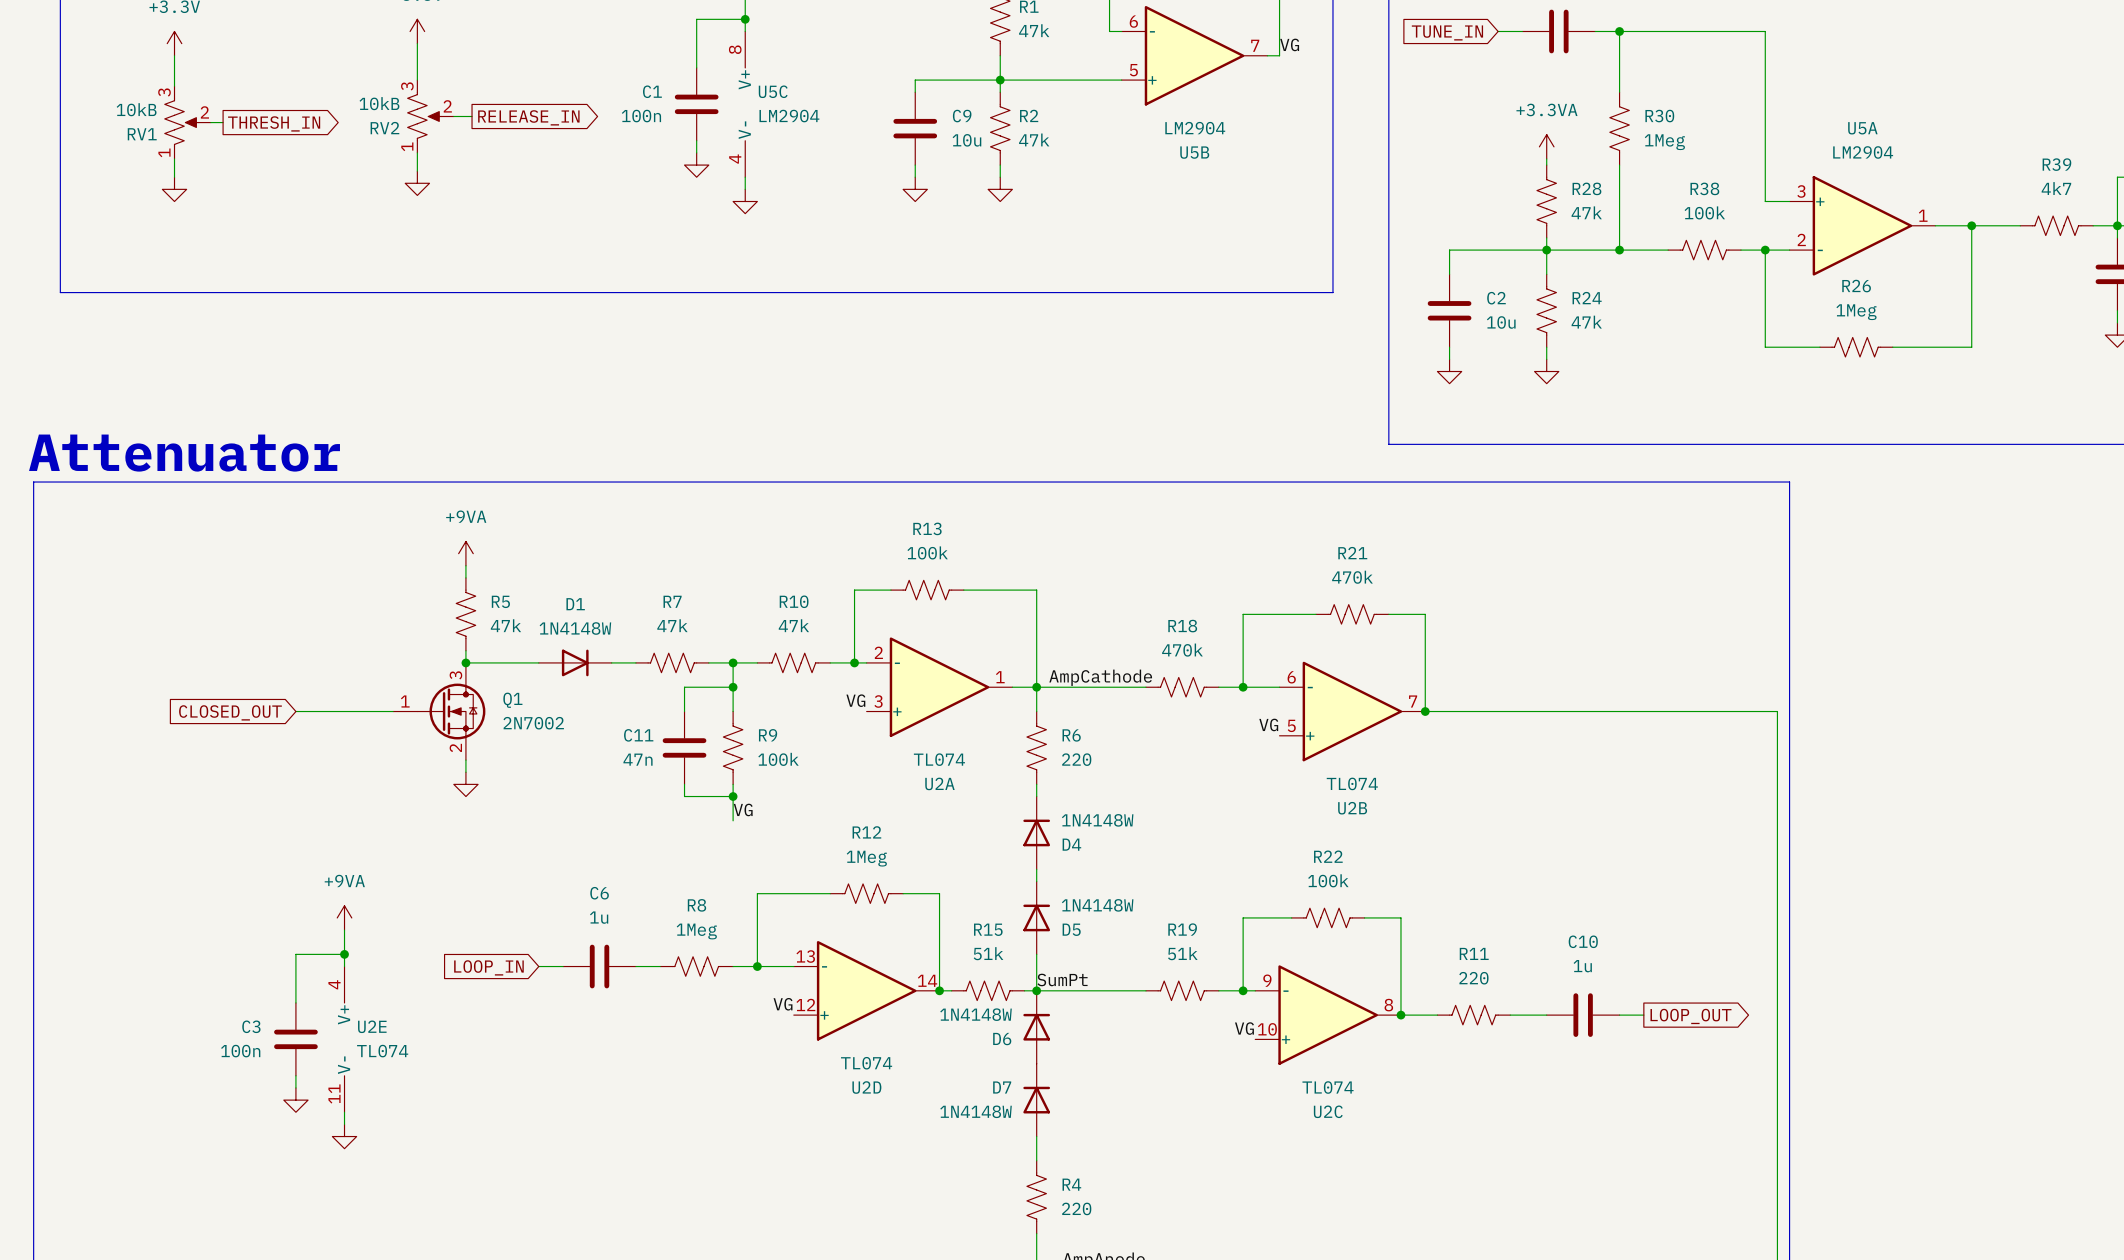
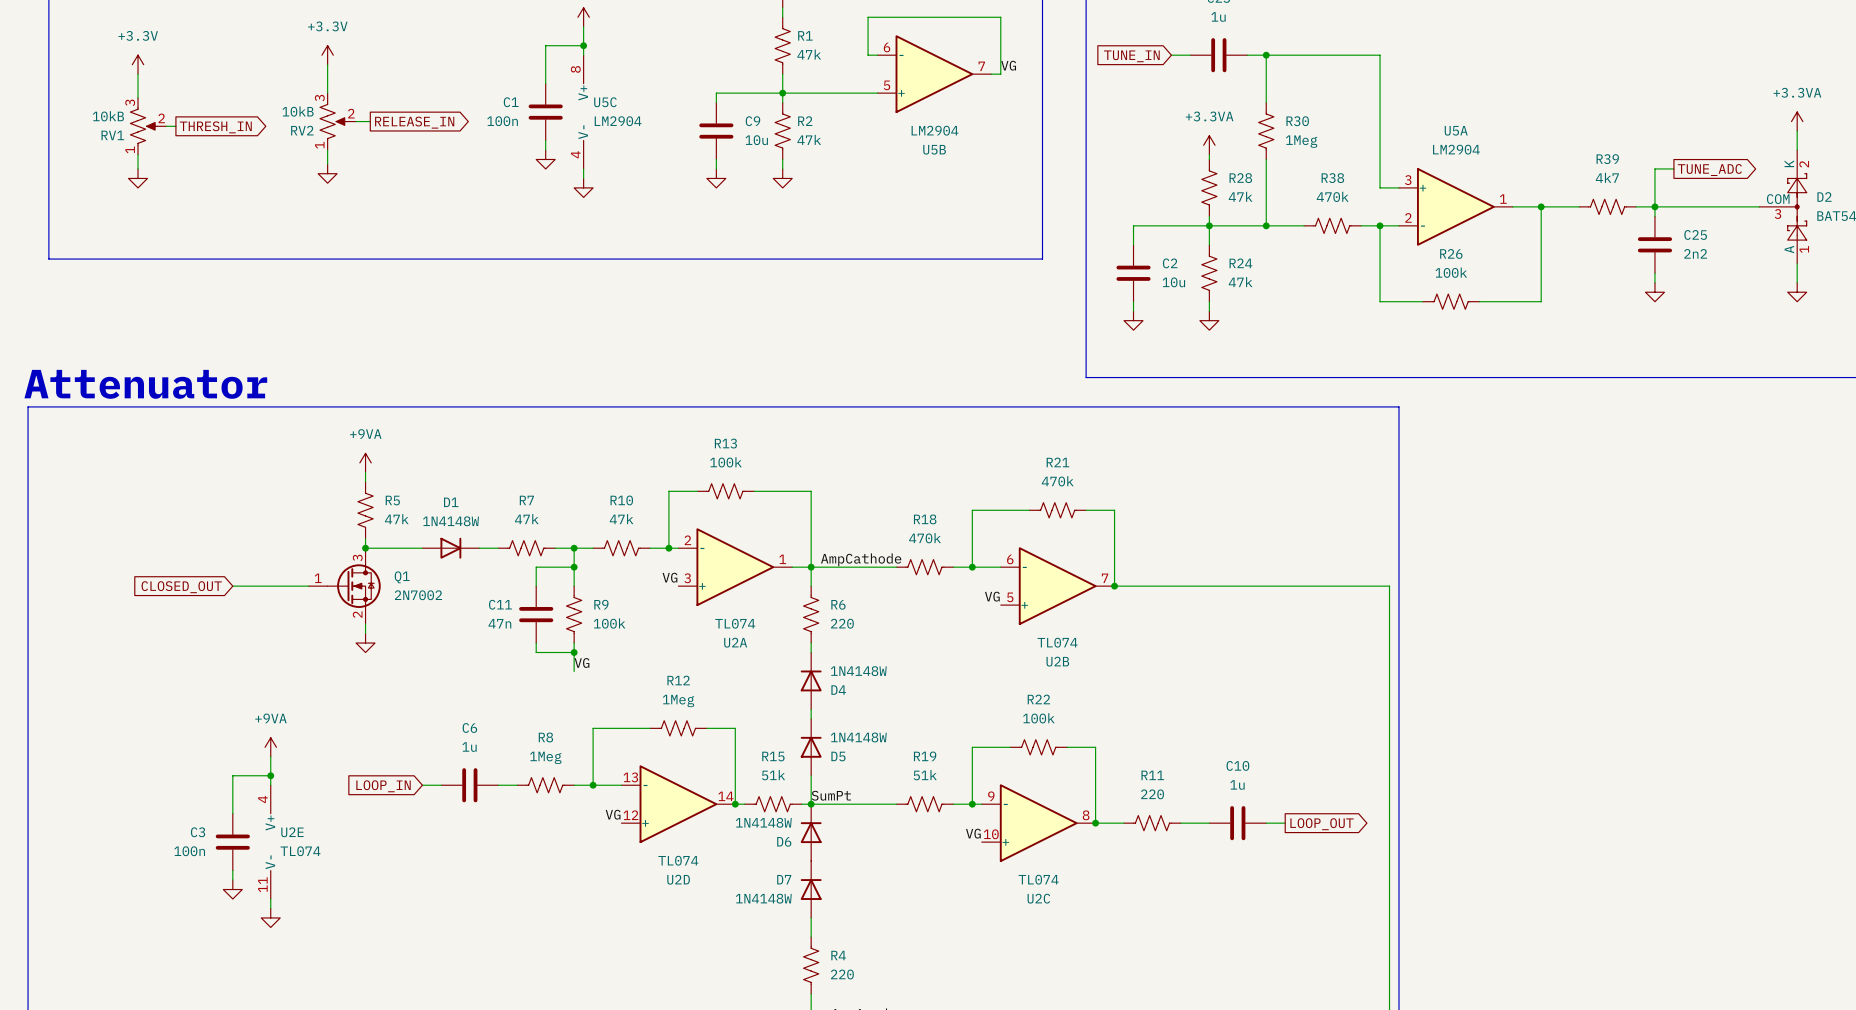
R38 value: 100k (1704, 212) -> 470k (1332, 196)
R26 value: 1Meg (1856, 312) -> 100k (1451, 272)

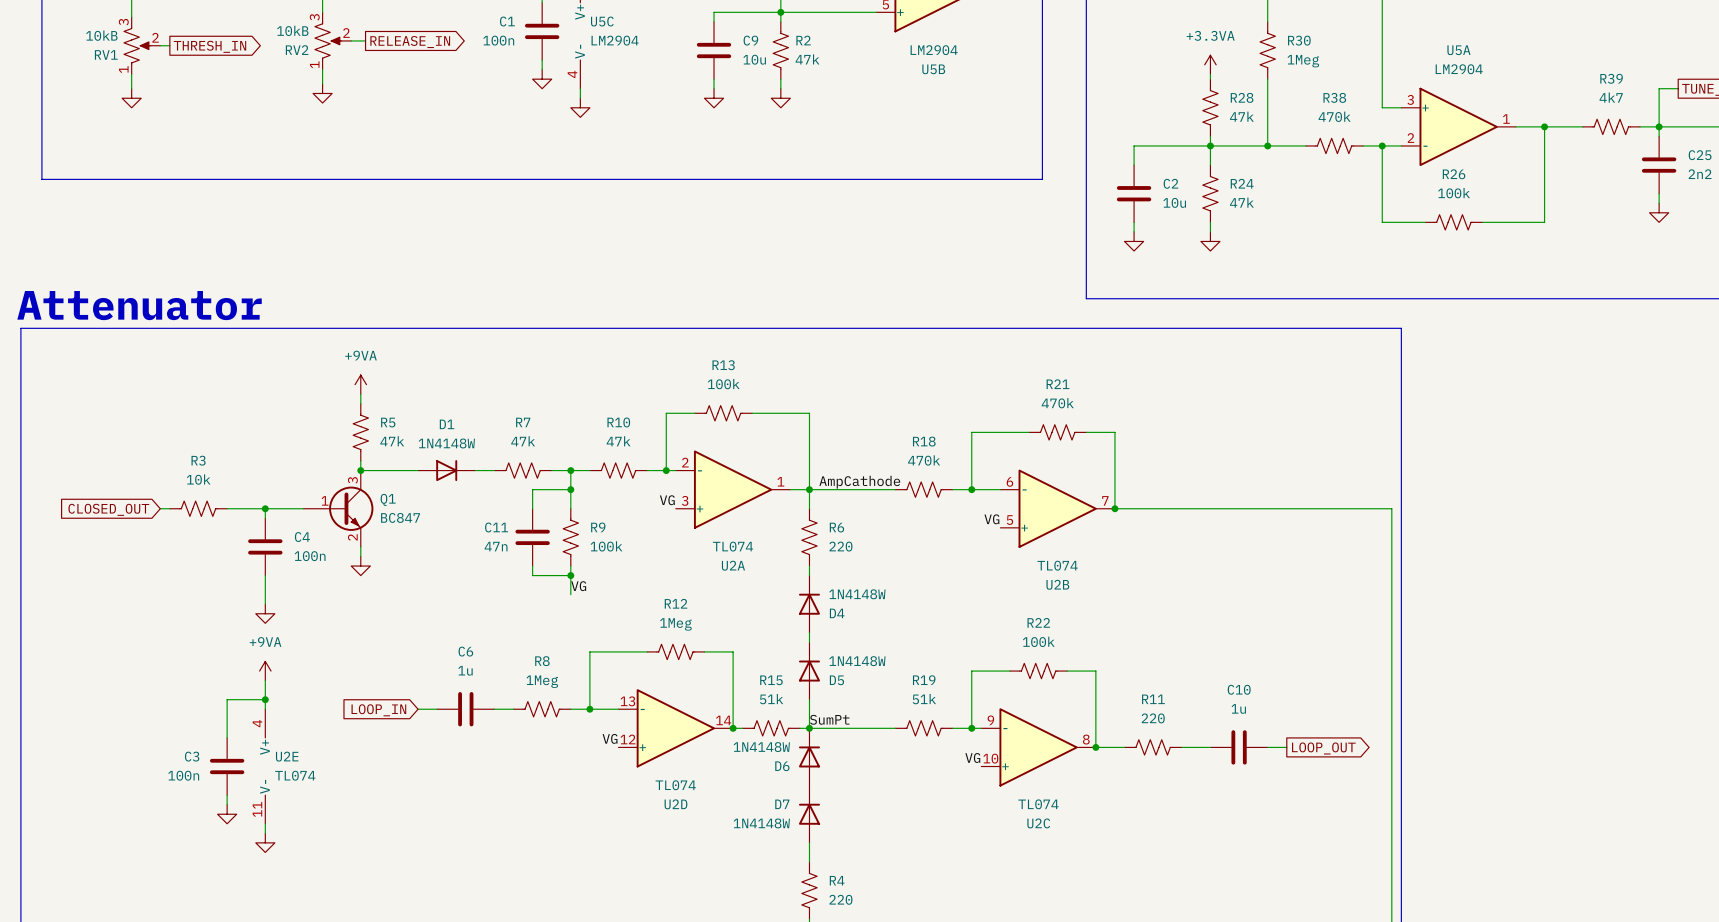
Q1 symbol: [308, 548, 381, 625] -> [303, 470, 374, 547]
wire: none -> (160, 508) (169, 508)
R3: none -> 10k (198, 508)
wire: none -> (265, 508) (265, 518)
junction: none -> (265, 508)
global label position: CLOSED_OUT (181, 587) -> CLOSED_OUT (108, 509)
Q1 value: 2N7002 (418, 595) -> BC847 (400, 517)
C4: none -> 100n (265, 546)
wire: none -> (265, 575) (265, 604)
power symbol: none -> (265, 613)

